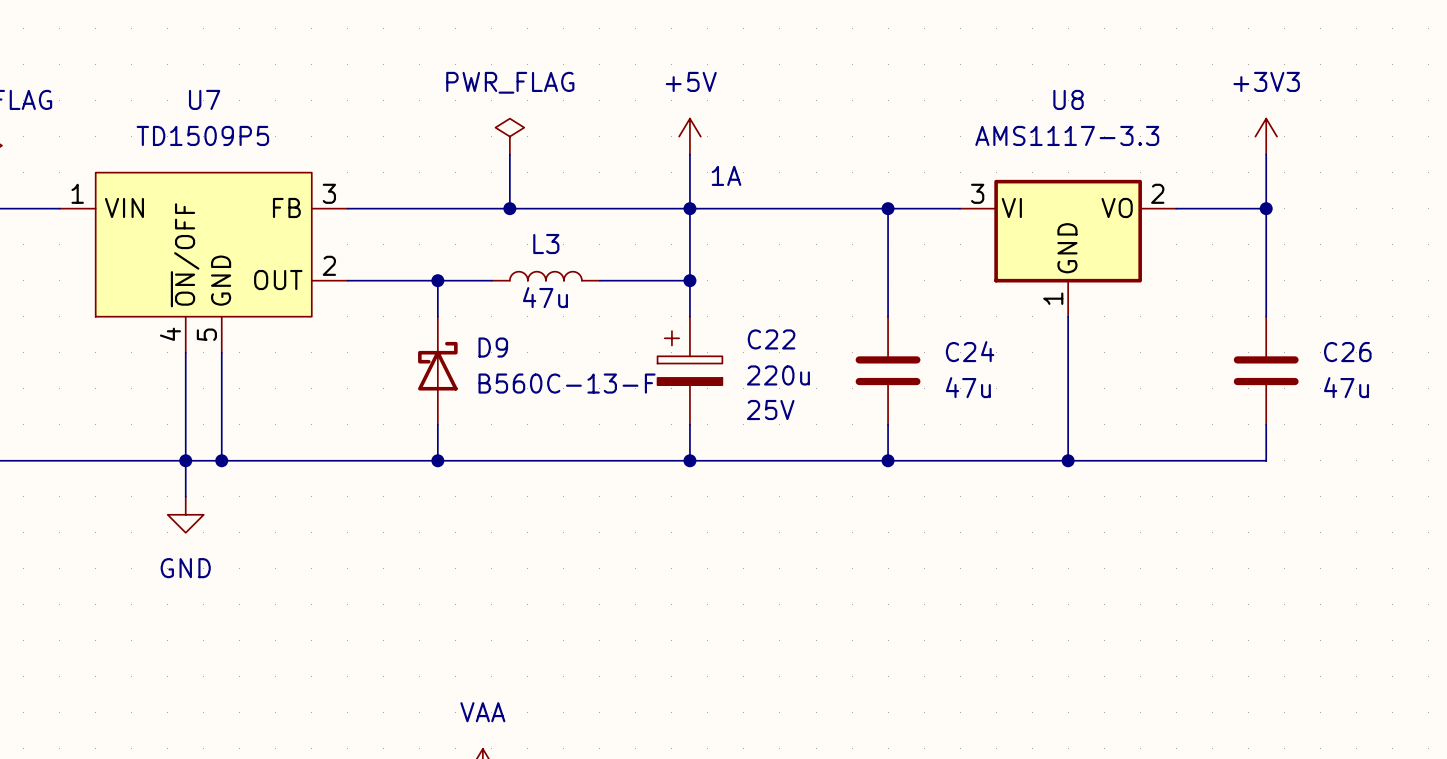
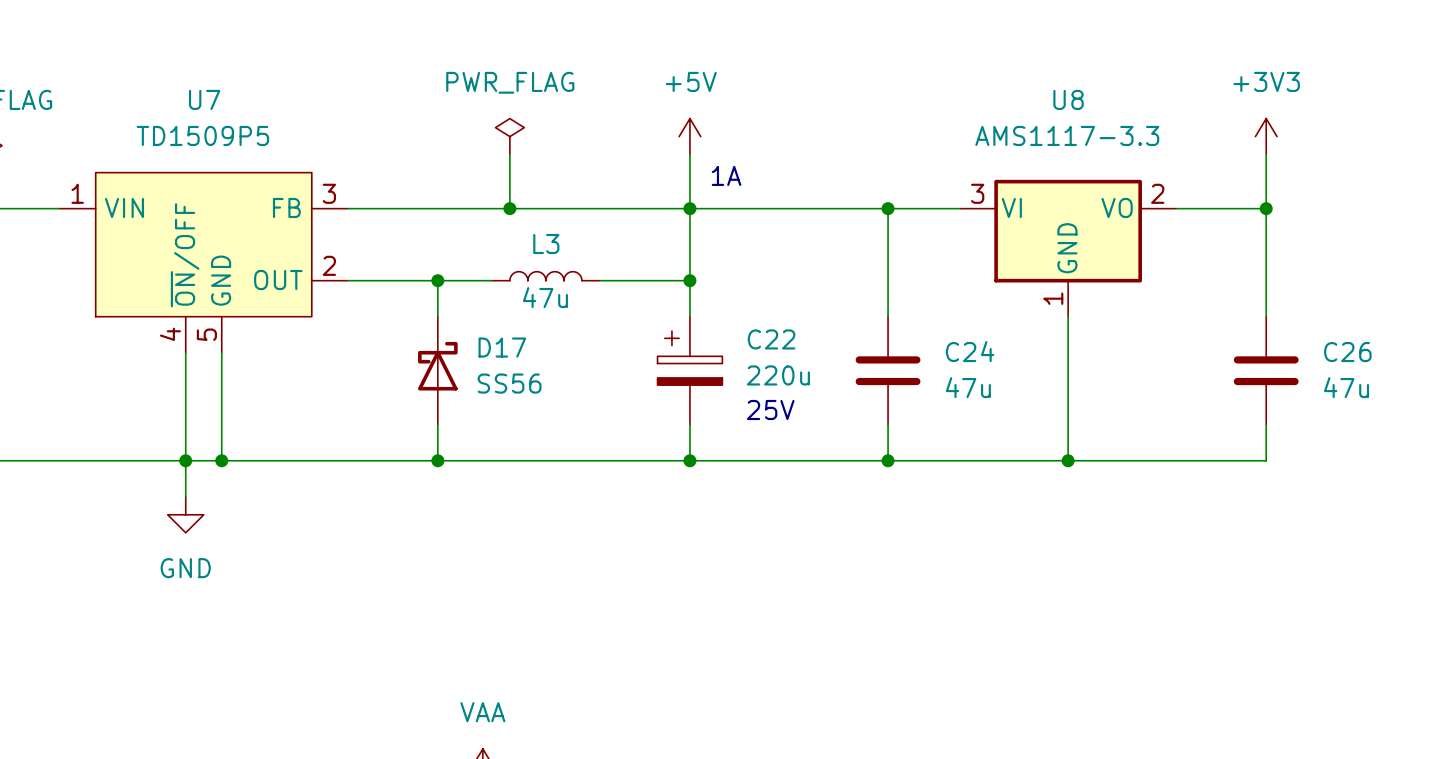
D9 name: D9 (493, 347) -> D17 (502, 347)
D9 value: B560C-13-F (567, 383) -> SS56 (509, 383)

